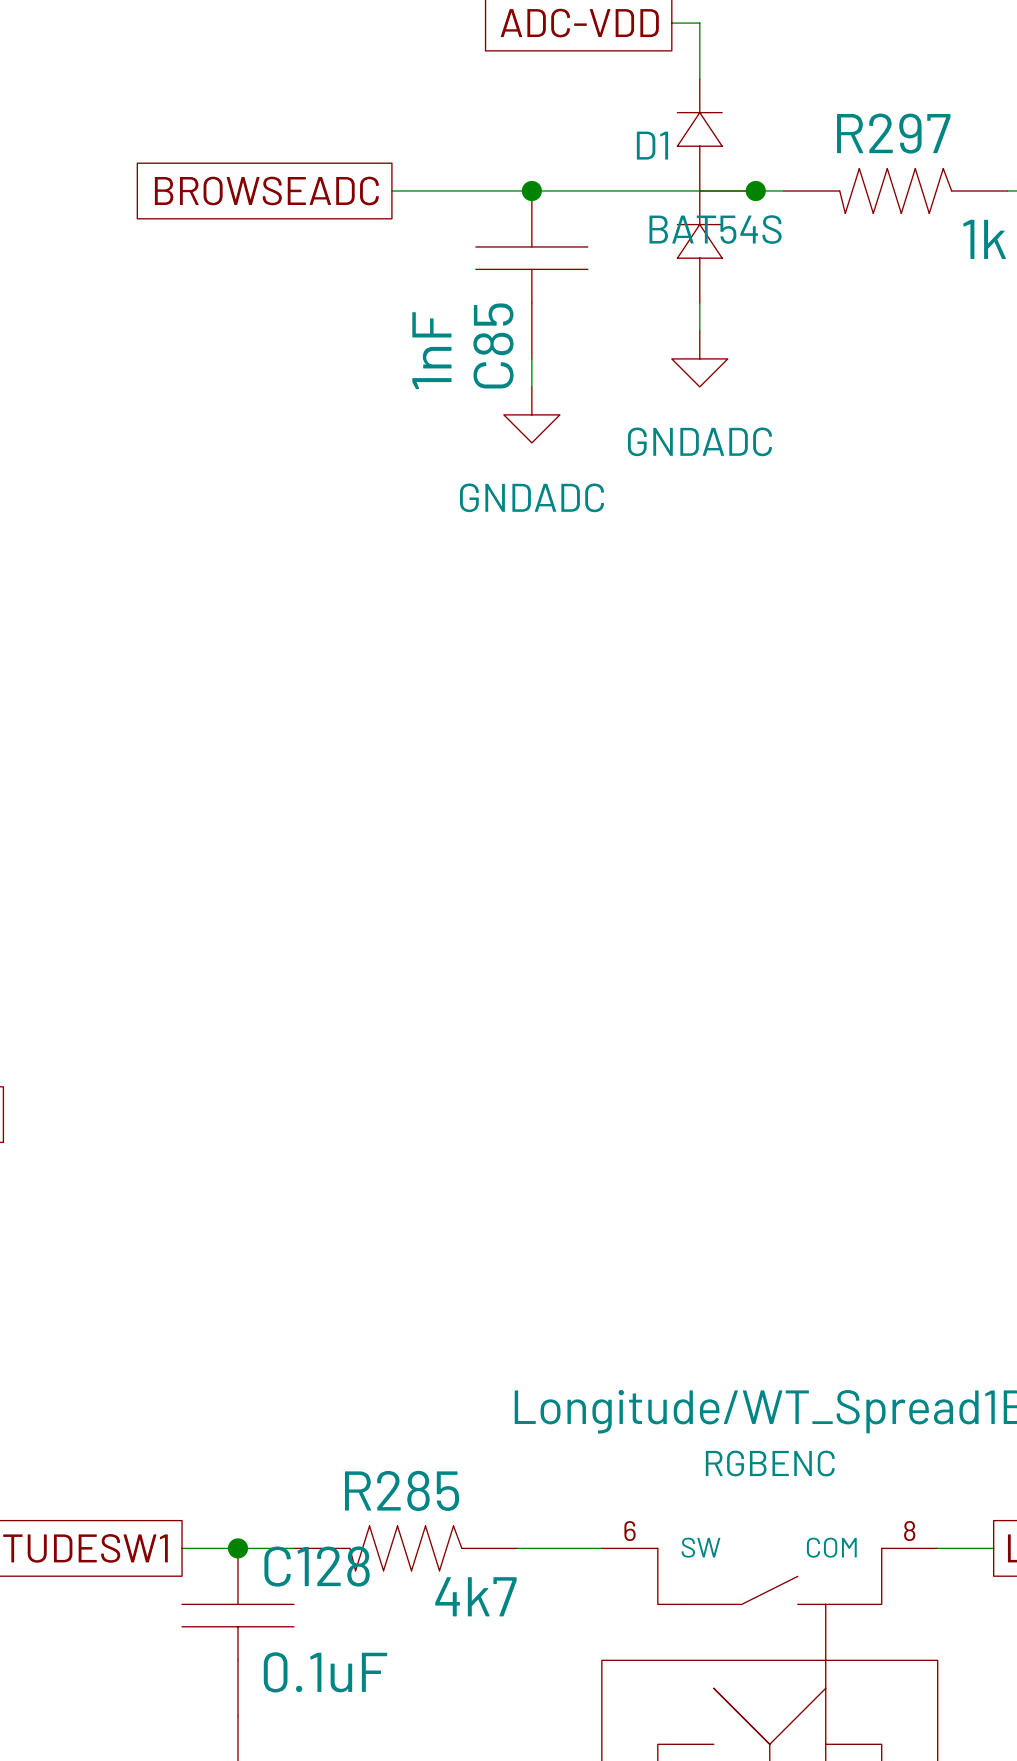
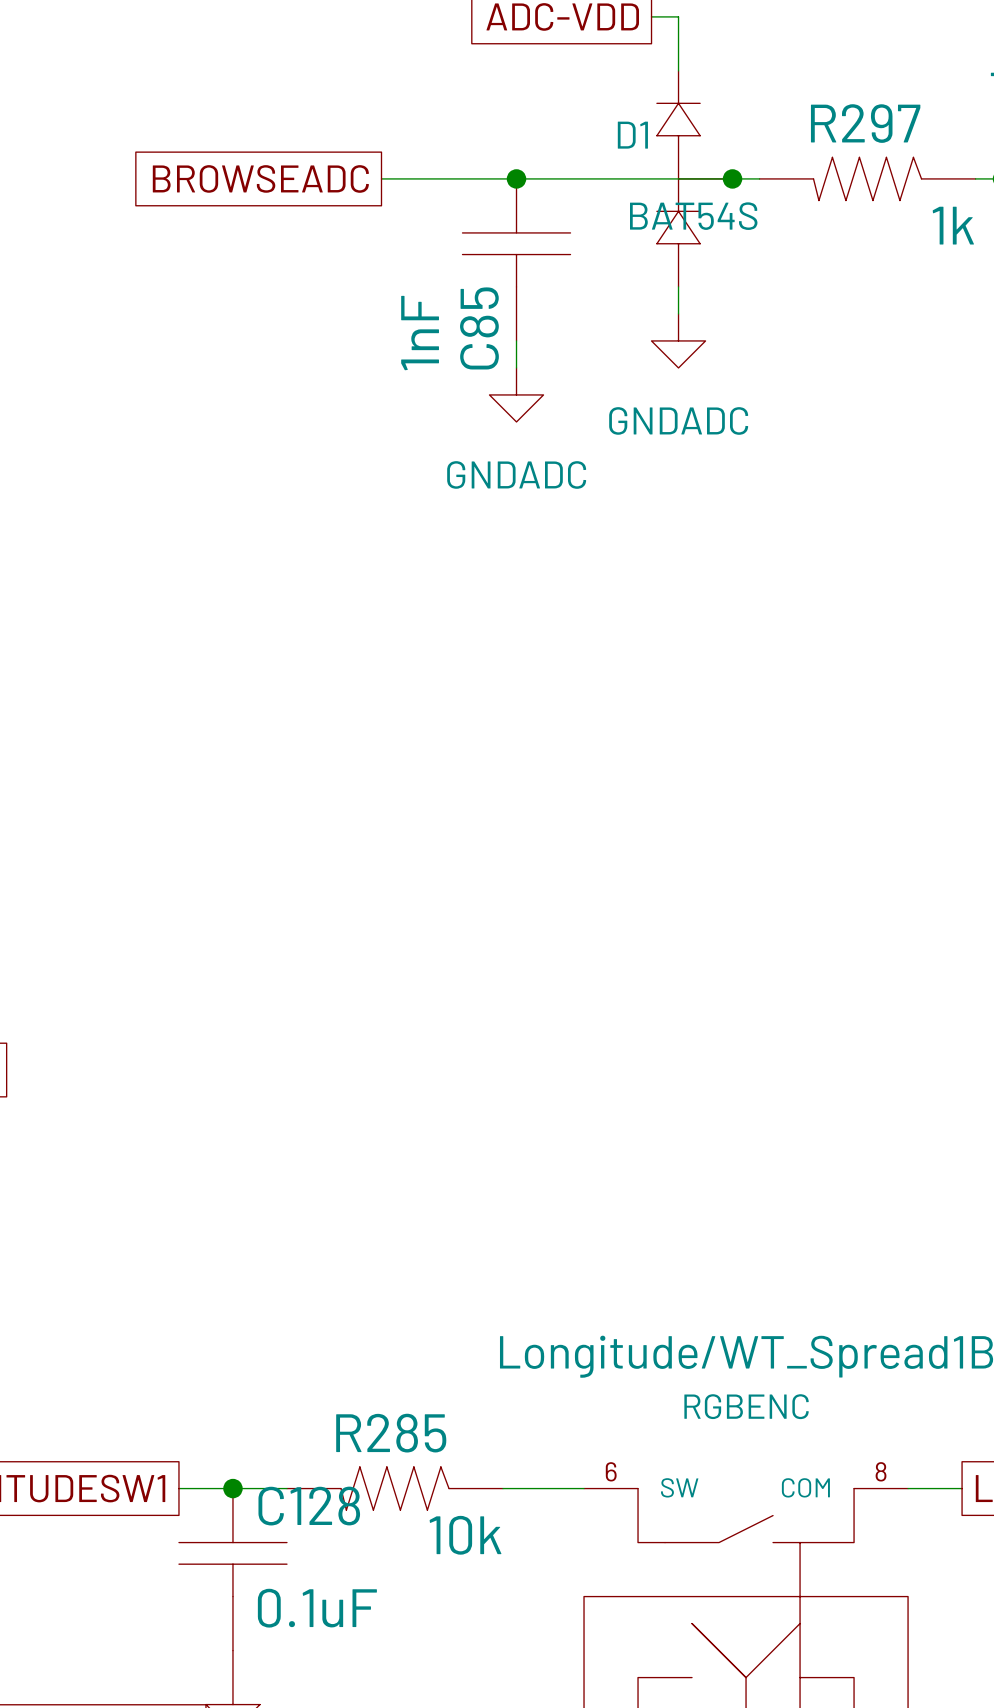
R285 value: 4k7 (475, 1596) -> 10k (465, 1535)

